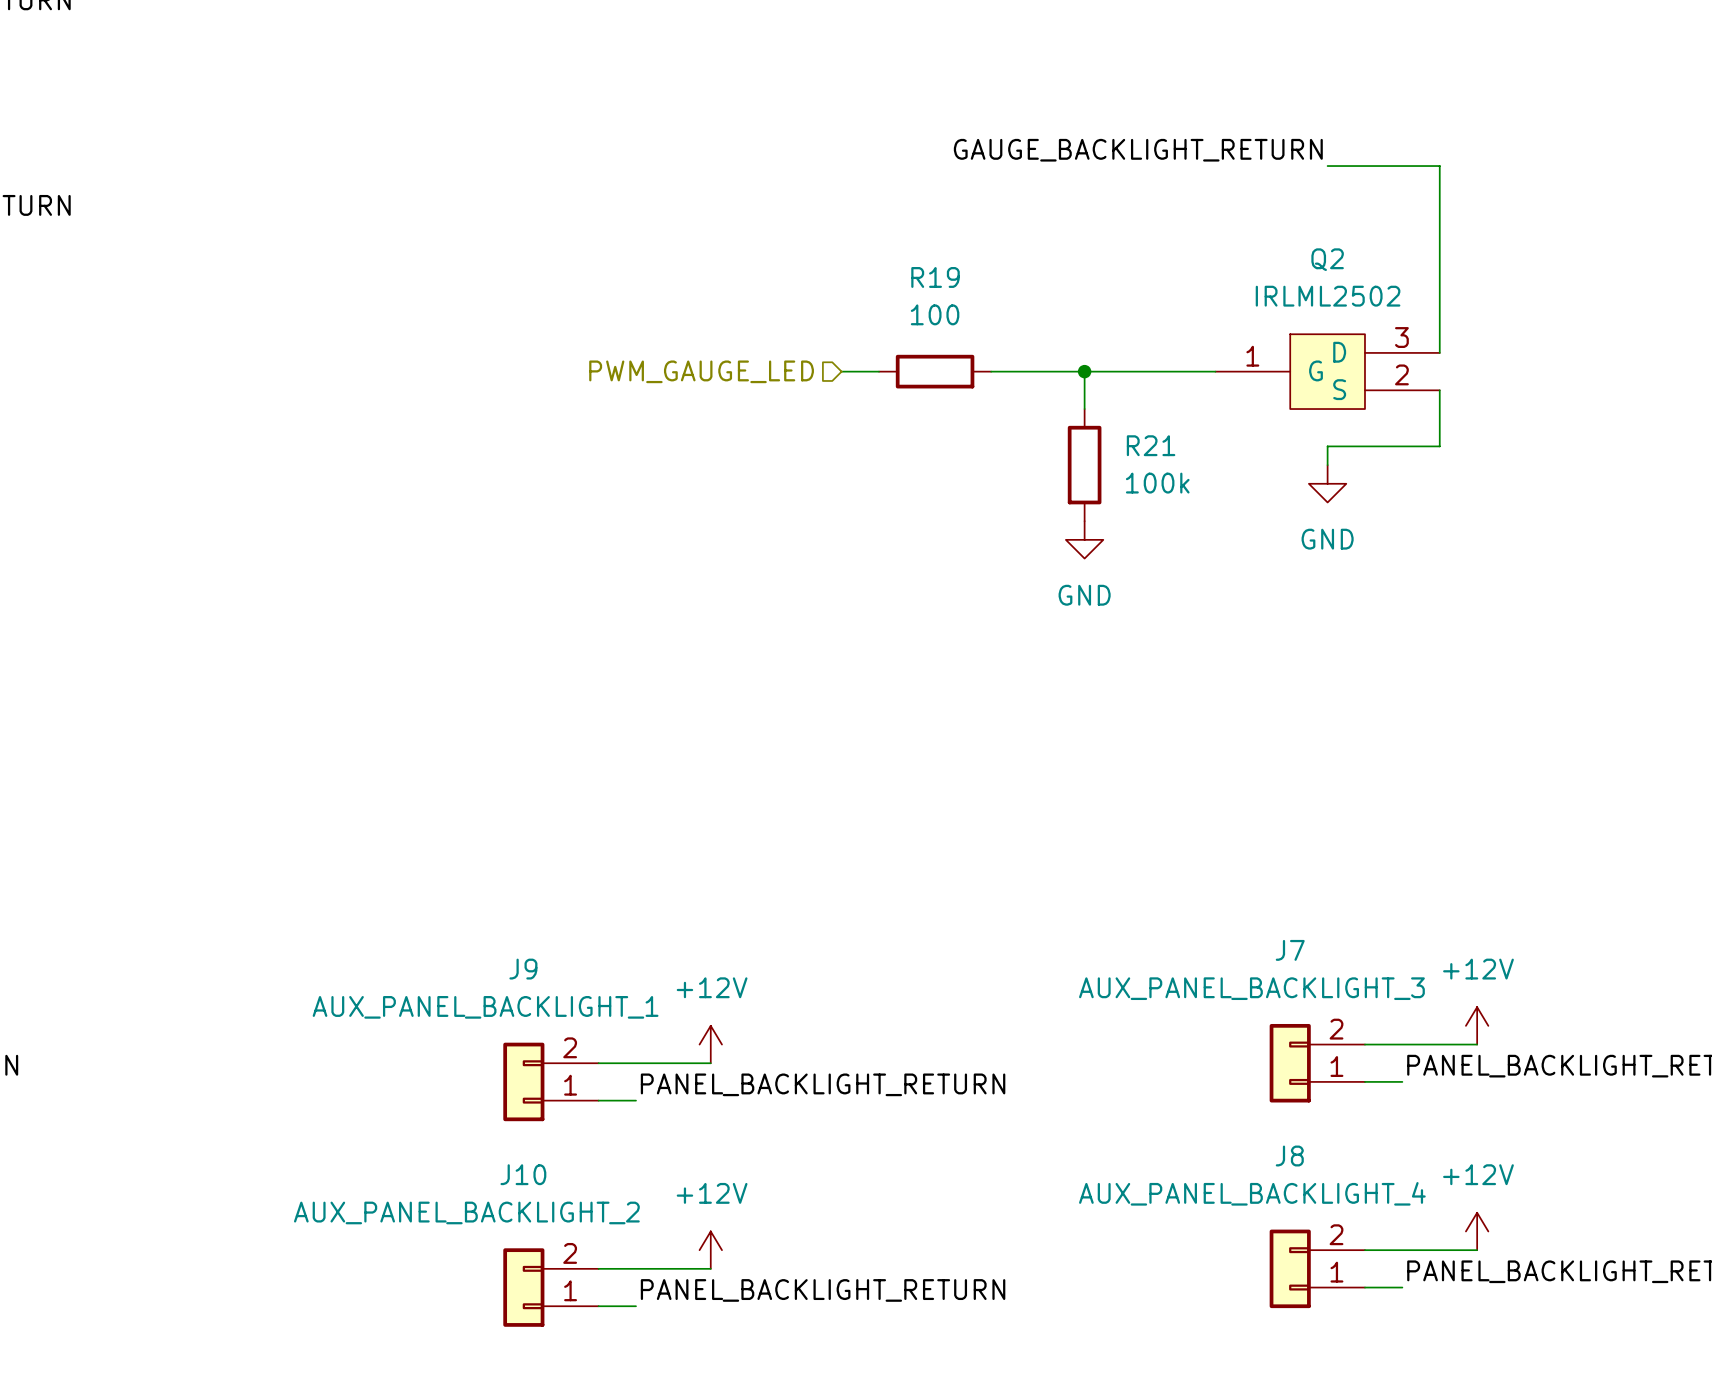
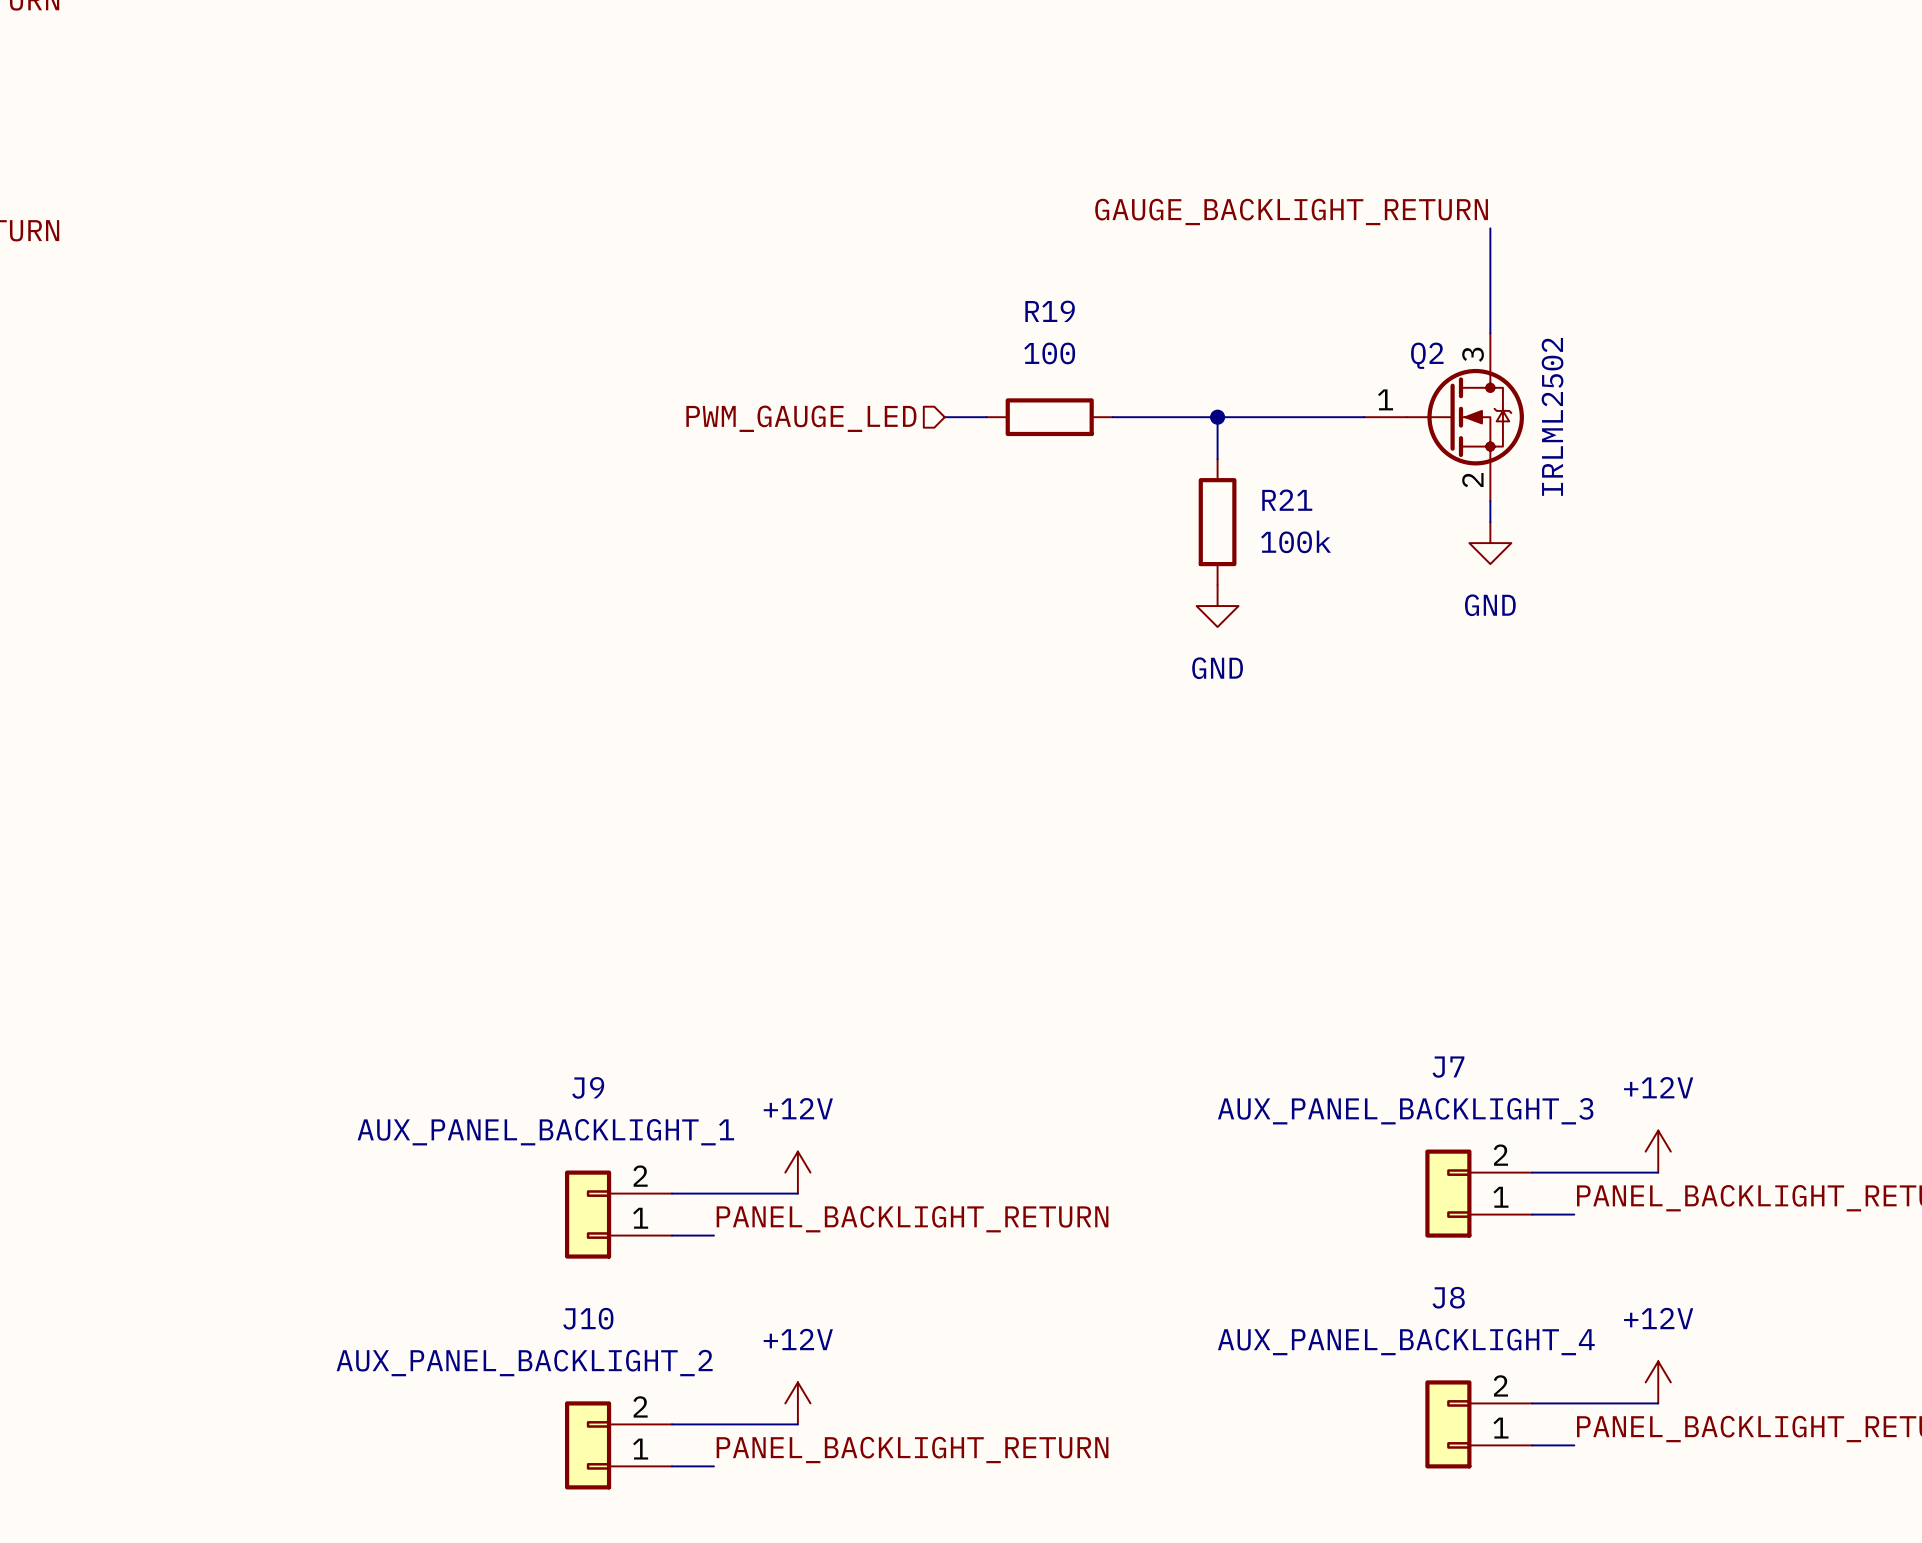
label position: GAUGE_BACKLIGHT_RETURN (1138, 150) -> GAUGE_BACKLIGHT_RETURN (1291, 211)
wire: (1327, 166) (1439, 166) (1439, 352) -> none
wire: none -> (1490, 228) (1490, 333)
Q2 name position: Q2 (1327, 259) -> Q2 (1427, 355)
Q2 value position: IRLML2502 (1328, 296) -> IRLML2502 (1552, 416)
Q2 symbol: [1215, 334, 1440, 410] -> [1364, 333, 1524, 502]
wire: (1439, 390) (1439, 446) (1327, 446) -> none

